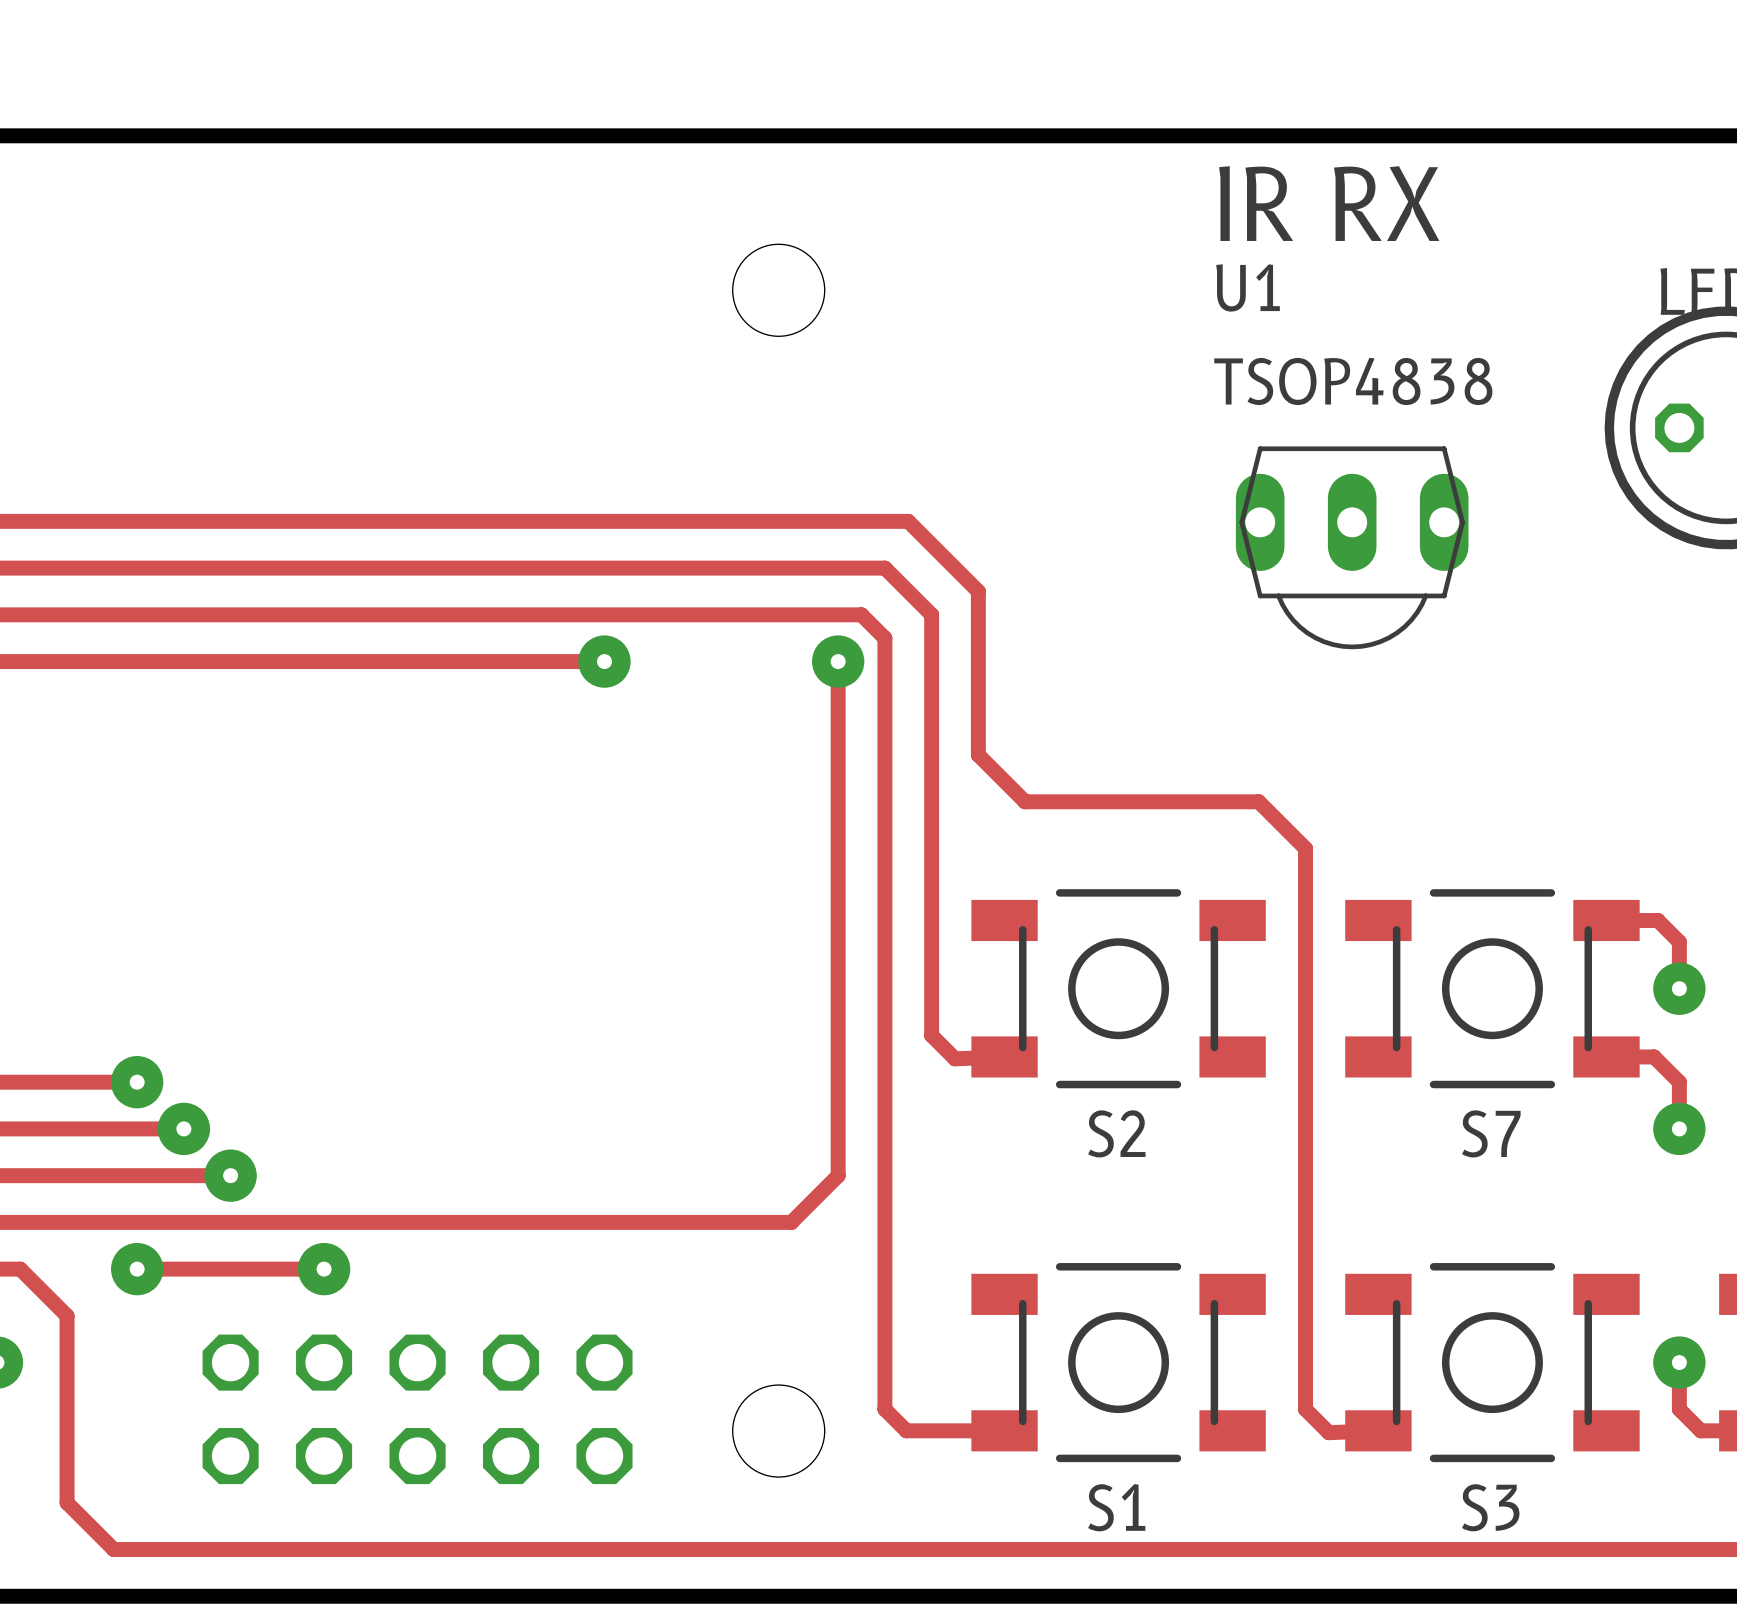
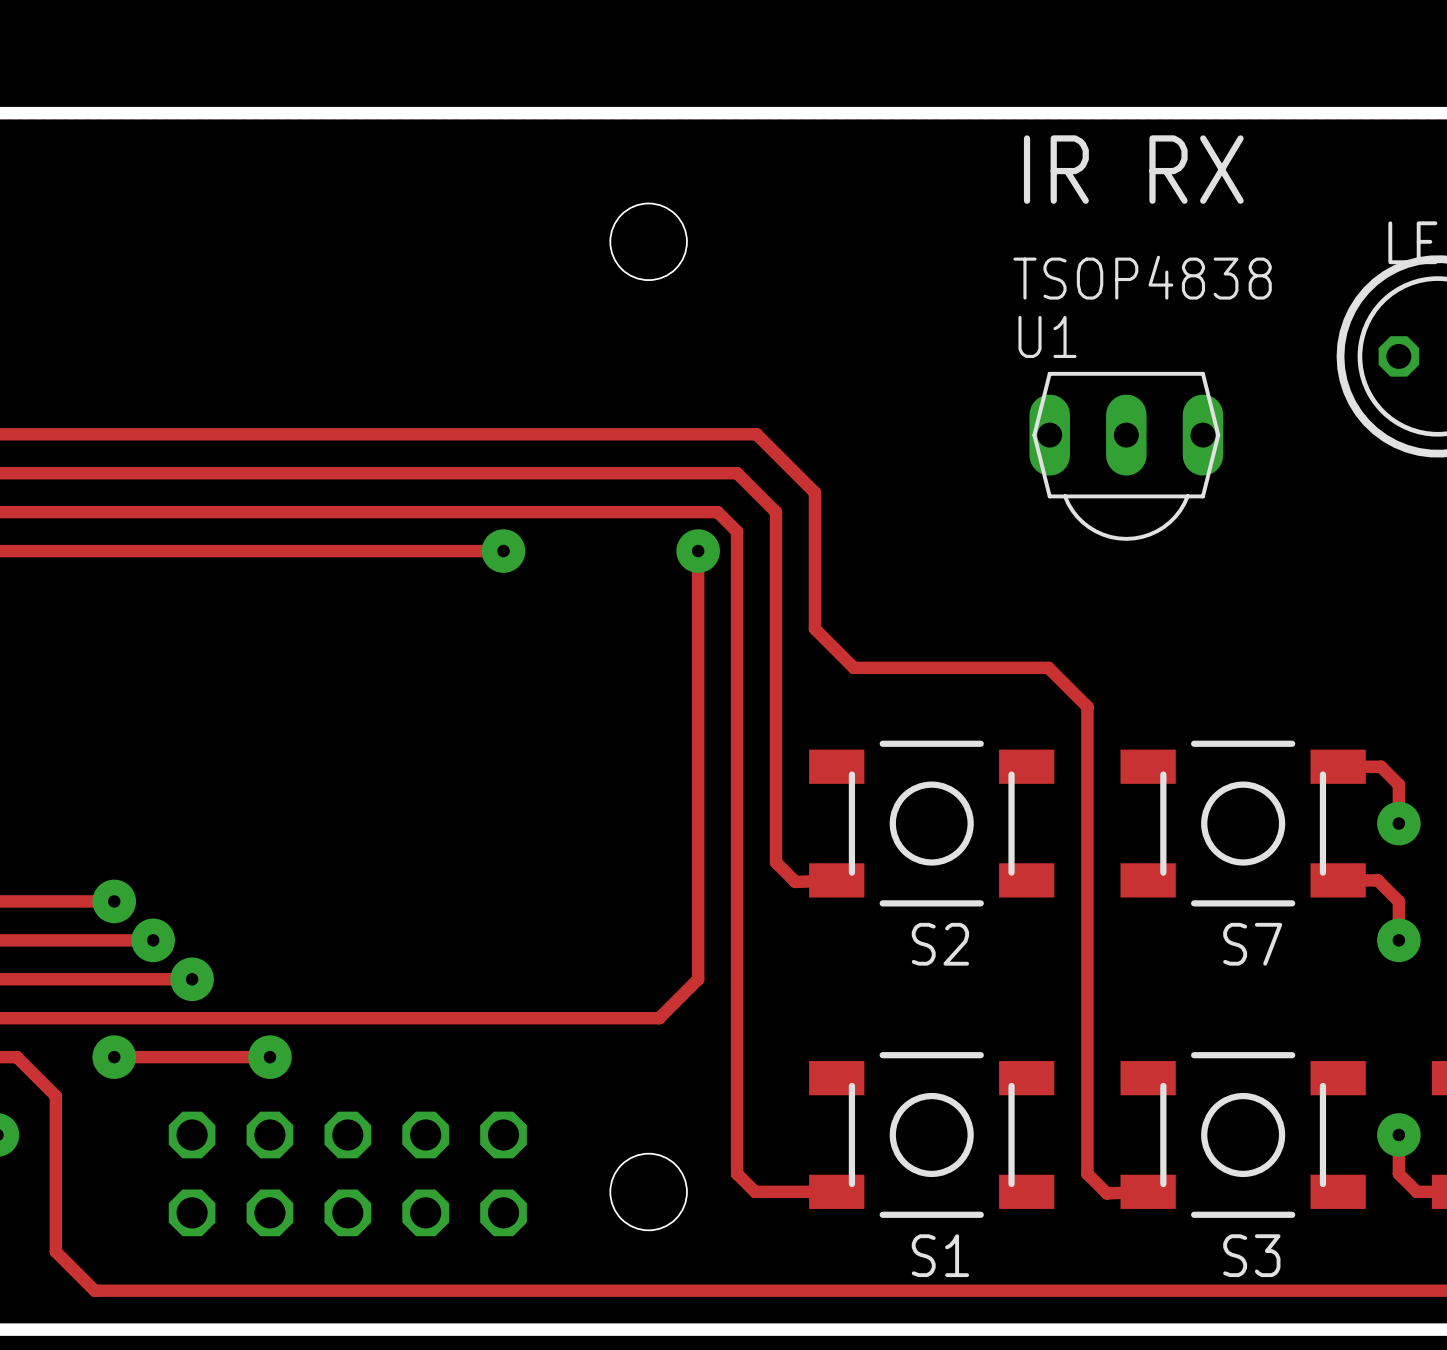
U1 name position: U1 (1248, 287) -> U1 (1047, 336)
U1 value position: TSOP4838 (1353, 381) -> TSOP4838 (1142, 277)

